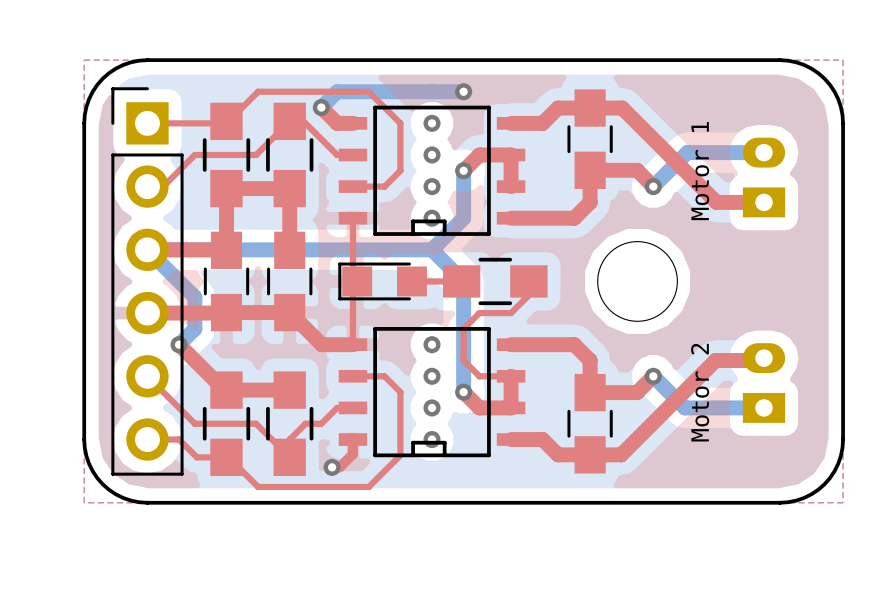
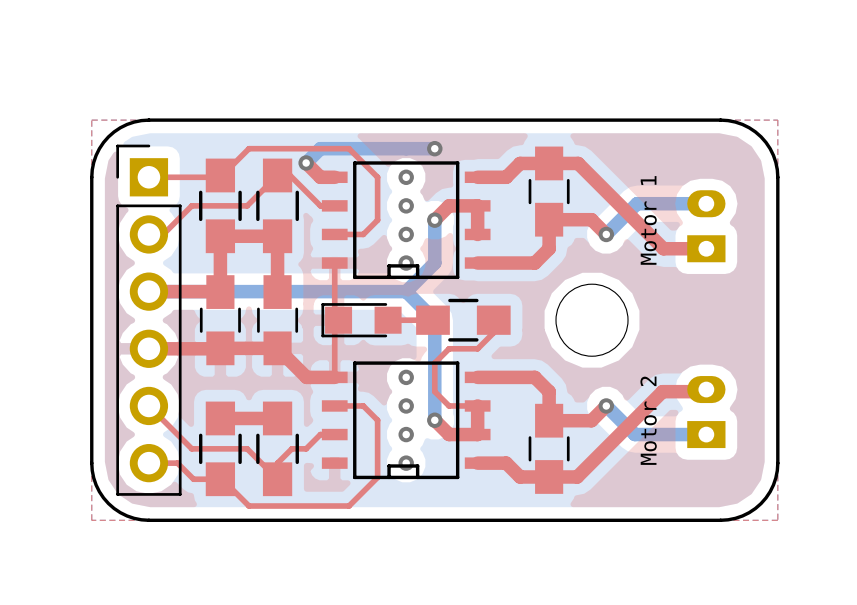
bottom track: (147, 249) (194, 297) (194, 328) (179, 344) -> none
top track: (179, 344) (226, 390) -> none
via: (179, 344) -> none
top track: (352, 439) (352, 454) (339, 467) (332, 467) -> none
via: (332, 467) -> none

